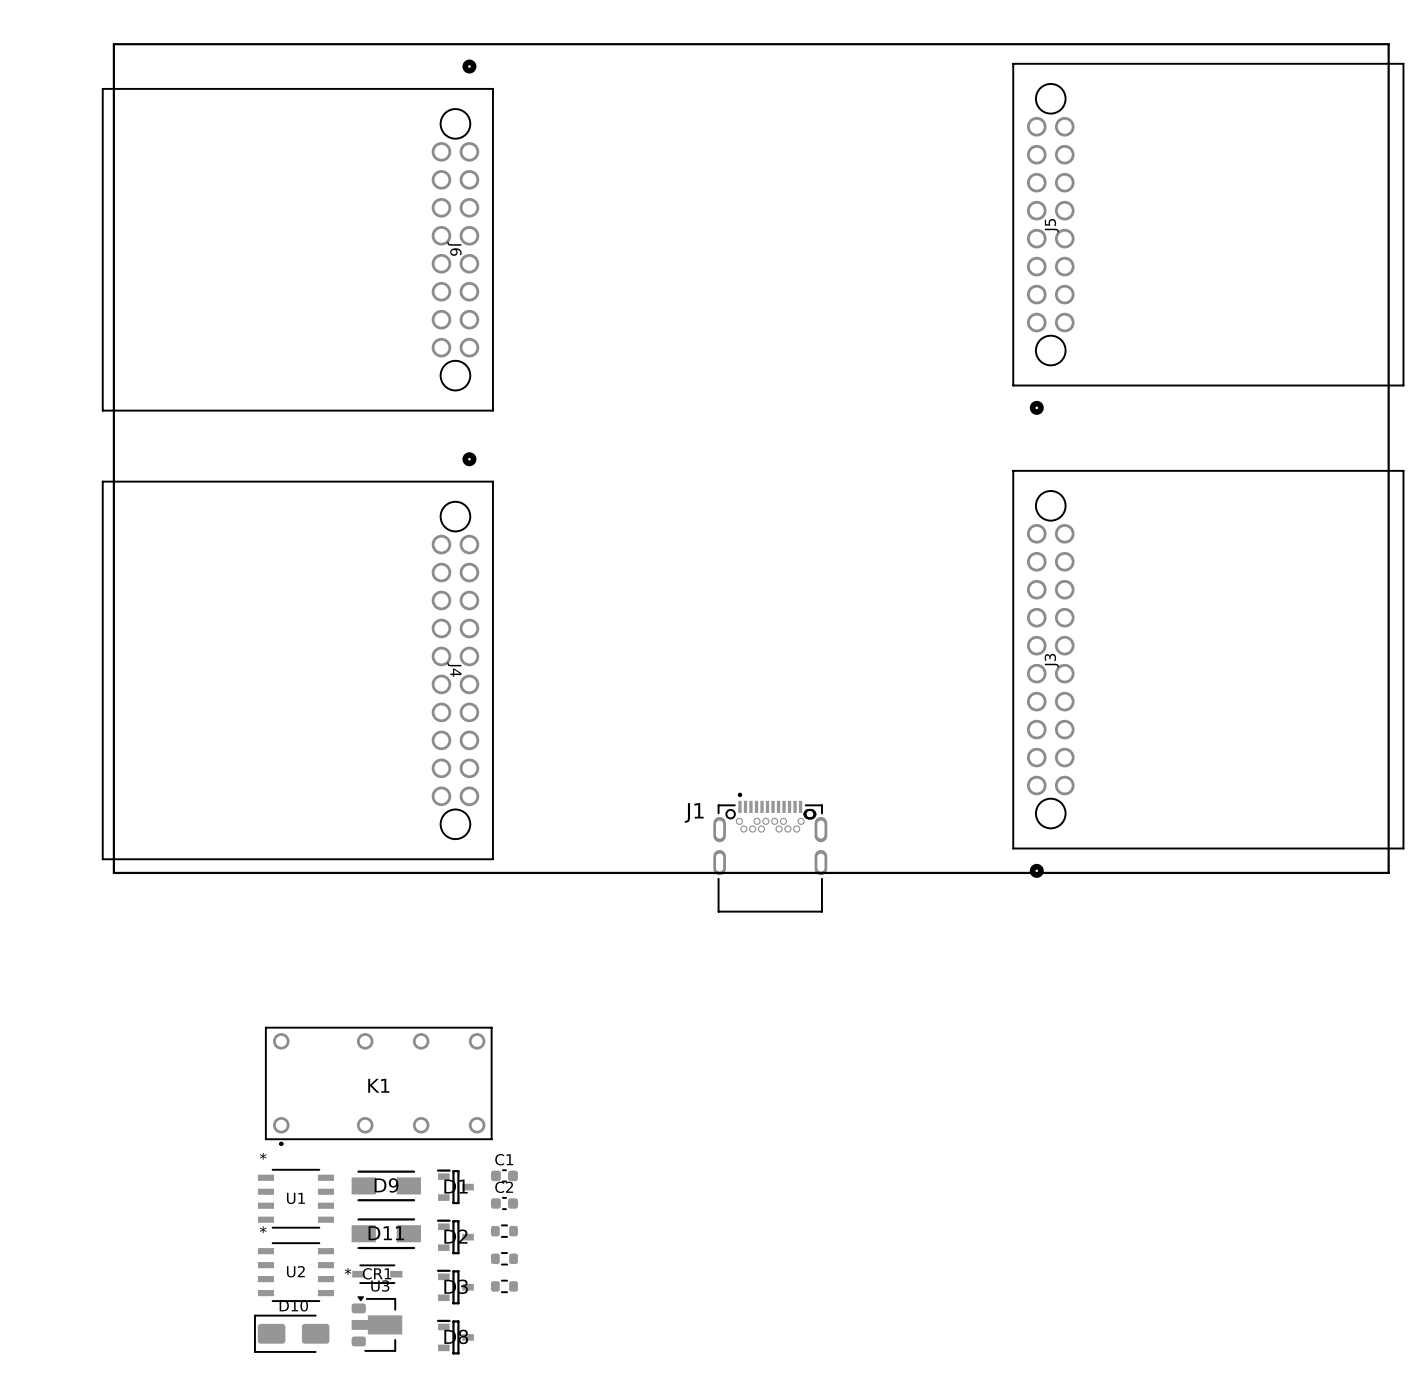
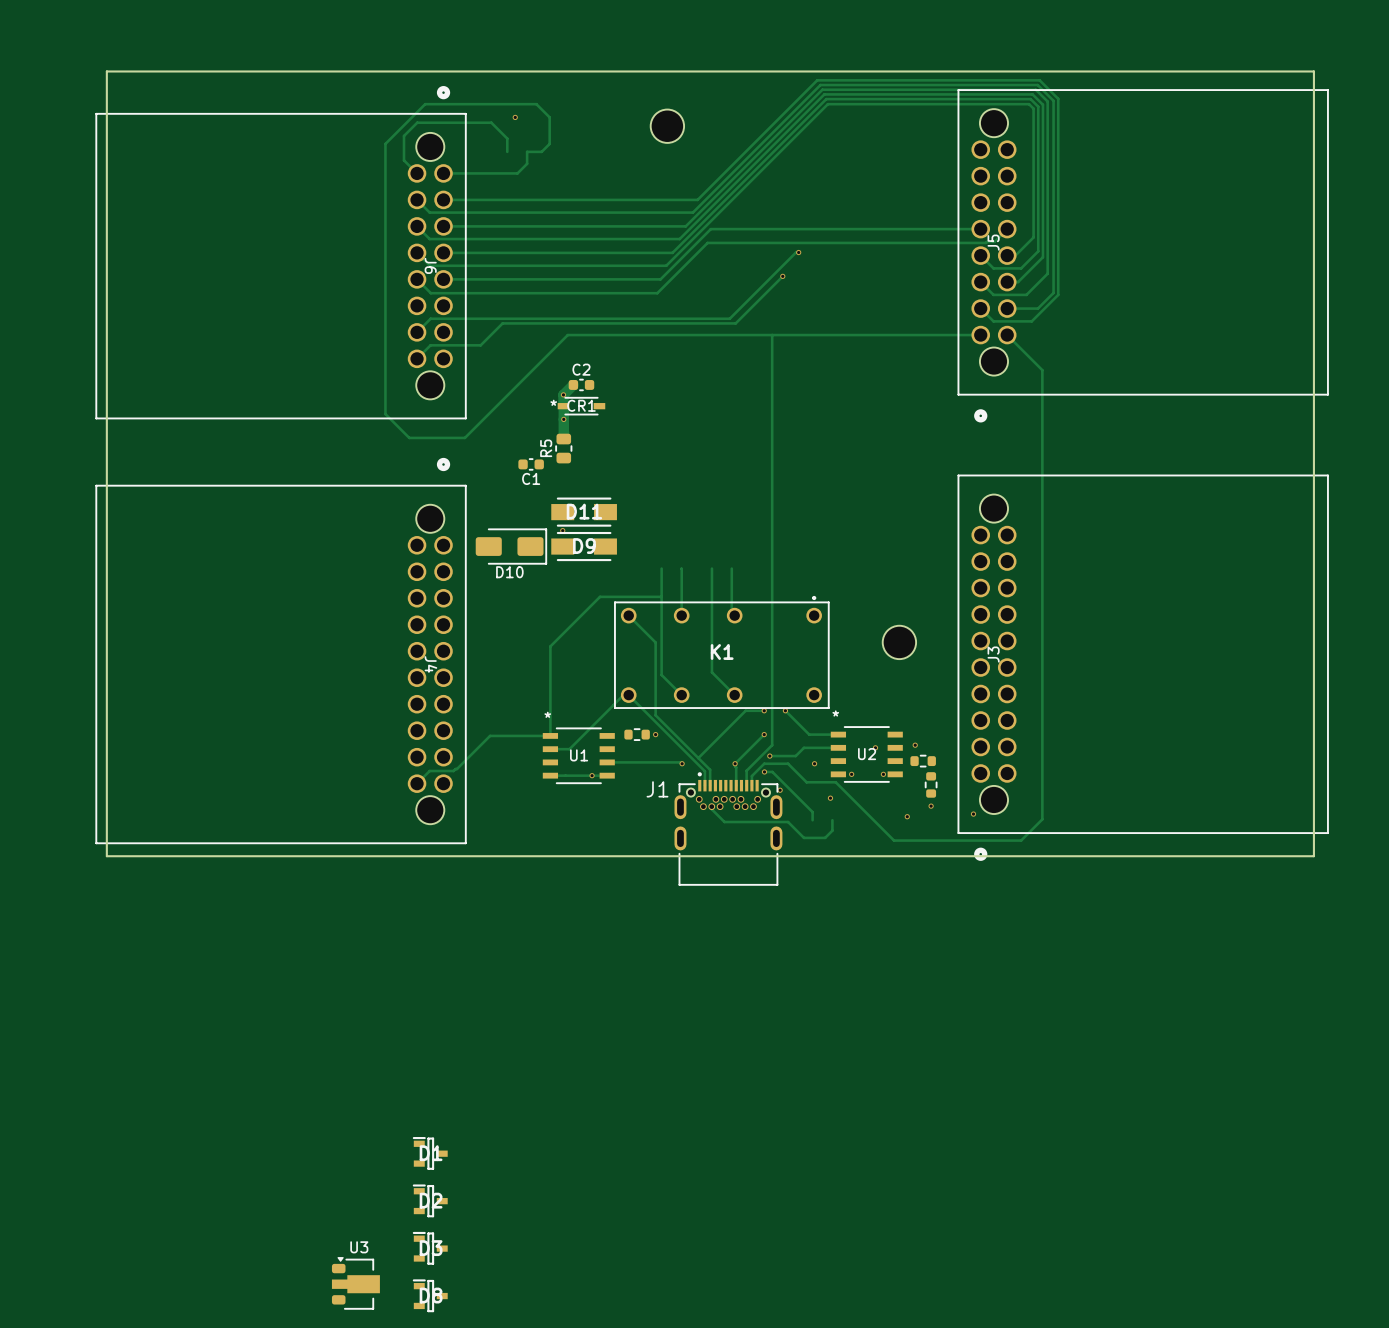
via: none -> (515, 117)
part: none -> (667, 126)
track: none -> (507, 151) (507, 138) (491, 122) (417, 122) (404, 135) (404, 160) (417, 173)
track: none -> (443, 173) (517, 173) (527, 163) (527, 151) (541, 151) (549, 143) (549, 117) (536, 104) (425, 104) (385, 143) (385, 414) (409, 437) (464, 437) (567, 335) (980, 335)
track: none -> (417, 199) (429, 212) (692, 212) (820, 85) (1037, 85) (1053, 100) (1053, 292) (1037, 308) (1007, 308)
track: none -> (443, 199) (697, 199) (817, 80) (1039, 80) (1058, 98) (1058, 294) (1031, 321) (993, 321) (980, 308)
track: none -> (417, 226) (429, 239) (679, 239) (824, 94) (1032, 94) (1042, 104) (1042, 257) (1018, 282) (1007, 282)
track: none -> (443, 226) (685, 226) (822, 89) (1035, 89) (1047, 101) (1047, 273) (1026, 294) (993, 294) (980, 282)
track: none -> (980, 229) (710, 229) (660, 279) (443, 279)
track: none -> (1007, 229) (994, 241) (985, 242) (707, 242) (657, 293) (430, 293) (417, 279)
track: none -> (417, 252) (429, 265) (666, 265) (827, 104) (1029, 104) (1033, 108) (1033, 237) (1015, 255) (1007, 255)
track: none -> (443, 252) (672, 252) (826, 99) (1030, 99) (1038, 106) (1038, 251) (1021, 268) (993, 268) (980, 255)
track: none -> (798, 252) (796, 252) (729, 318) (430, 318) (417, 332)
via: none -> (798, 252)
track: none -> (782, 276) (735, 323) (502, 323) (480, 345) (430, 345) (417, 358)
via: none -> (782, 276)
track: none -> (772, 335) (772, 745) (746, 770) (746, 785)
track: none -> (1007, 335) (1042, 370) (1042, 819) (1021, 840) (894, 840) (835, 782) (806, 782) (788, 763) (764, 763) (751, 776) (751, 785)
track: none -> (573, 384) (563, 394) (563, 432)
via: none -> (563, 394)
via: none -> (563, 419)
R5: none -> (563, 448)
via: none -> (562, 530)
track: none -> (661, 568) (661, 675) (681, 695)
track: none -> (681, 568) (681, 615)
track: none -> (711, 568) (711, 672) (734, 695)
track: none -> (731, 568) (731, 612) (734, 615)
track: none -> (661, 596) (600, 596) (550, 646) (550, 735) (490, 735) (456, 769) (453, 771) (429, 771) (417, 783)
track: none -> (628, 615) (655, 642) (655, 715) (710, 769) (710, 785)
part: none -> (899, 642)
track: none -> (613, 705) (623, 695) (628, 695) (704, 771) (704, 785)
track: none -> (613, 705) (569, 749) (550, 749)
track: none -> (764, 710) (745, 710) (698, 758)
via: none -> (764, 710)
track: none -> (785, 710) (809, 734) (838, 734)
via: none -> (785, 710)
part: none -> (637, 734)
via: none -> (655, 734)
track: none -> (764, 734) (735, 763) (736, 785)
via: none -> (764, 734)
via: none -> (915, 745)
track: none -> (838, 747) (803, 747) (795, 756) (769, 756)
via: none -> (875, 747)
via: none -> (769, 756)
part: none -> (923, 761)
track: none -> (607, 762) (682, 763)
via: none -> (682, 763)
via: none -> (735, 763)
via: none -> (814, 763)
track: none -> (764, 771) (772, 771) (812, 812) (812, 820)
via: none -> (764, 771)
via: none -> (851, 774)
via: none -> (883, 774)
track: none -> (550, 775) (607, 775)
via: none -> (592, 775)
J1 footprint: [713, 792, 828, 913] -> [674, 772, 783, 886]
part: none -> (931, 784)
via: none -> (780, 790)
via: none -> (830, 798)
track: none -> (711, 806) (711, 809) (724, 822) (788, 822) (803, 837) (825, 837) (832, 830) (832, 820)
via: none -> (931, 806)
via: none -> (973, 814)
via: none -> (907, 816)
K1 rotation: 0° (378, 1086) -> 180° (721, 652)
K1 position: (378, 1086) -> (721, 652)
C1 name position: C1 (504, 1159) -> C1 (531, 478)
C1 position: (504, 1175) -> (531, 464)
D9 position: (386, 1185) -> (584, 546)
U1 position: (295, 1198) -> (578, 755)
C2 position: (504, 1203) -> (581, 384)
part: (504, 1231) -> none
D11 position: (386, 1233) -> (584, 512)
part: (504, 1258) -> none
U2 position: (295, 1272) -> (866, 754)
CR1 position: (377, 1274) -> (581, 406)
part: (504, 1286) -> none
D10 rotation: 0° (291, 1333) -> 180° (511, 546)
D10 position: (291, 1333) -> (511, 546)

